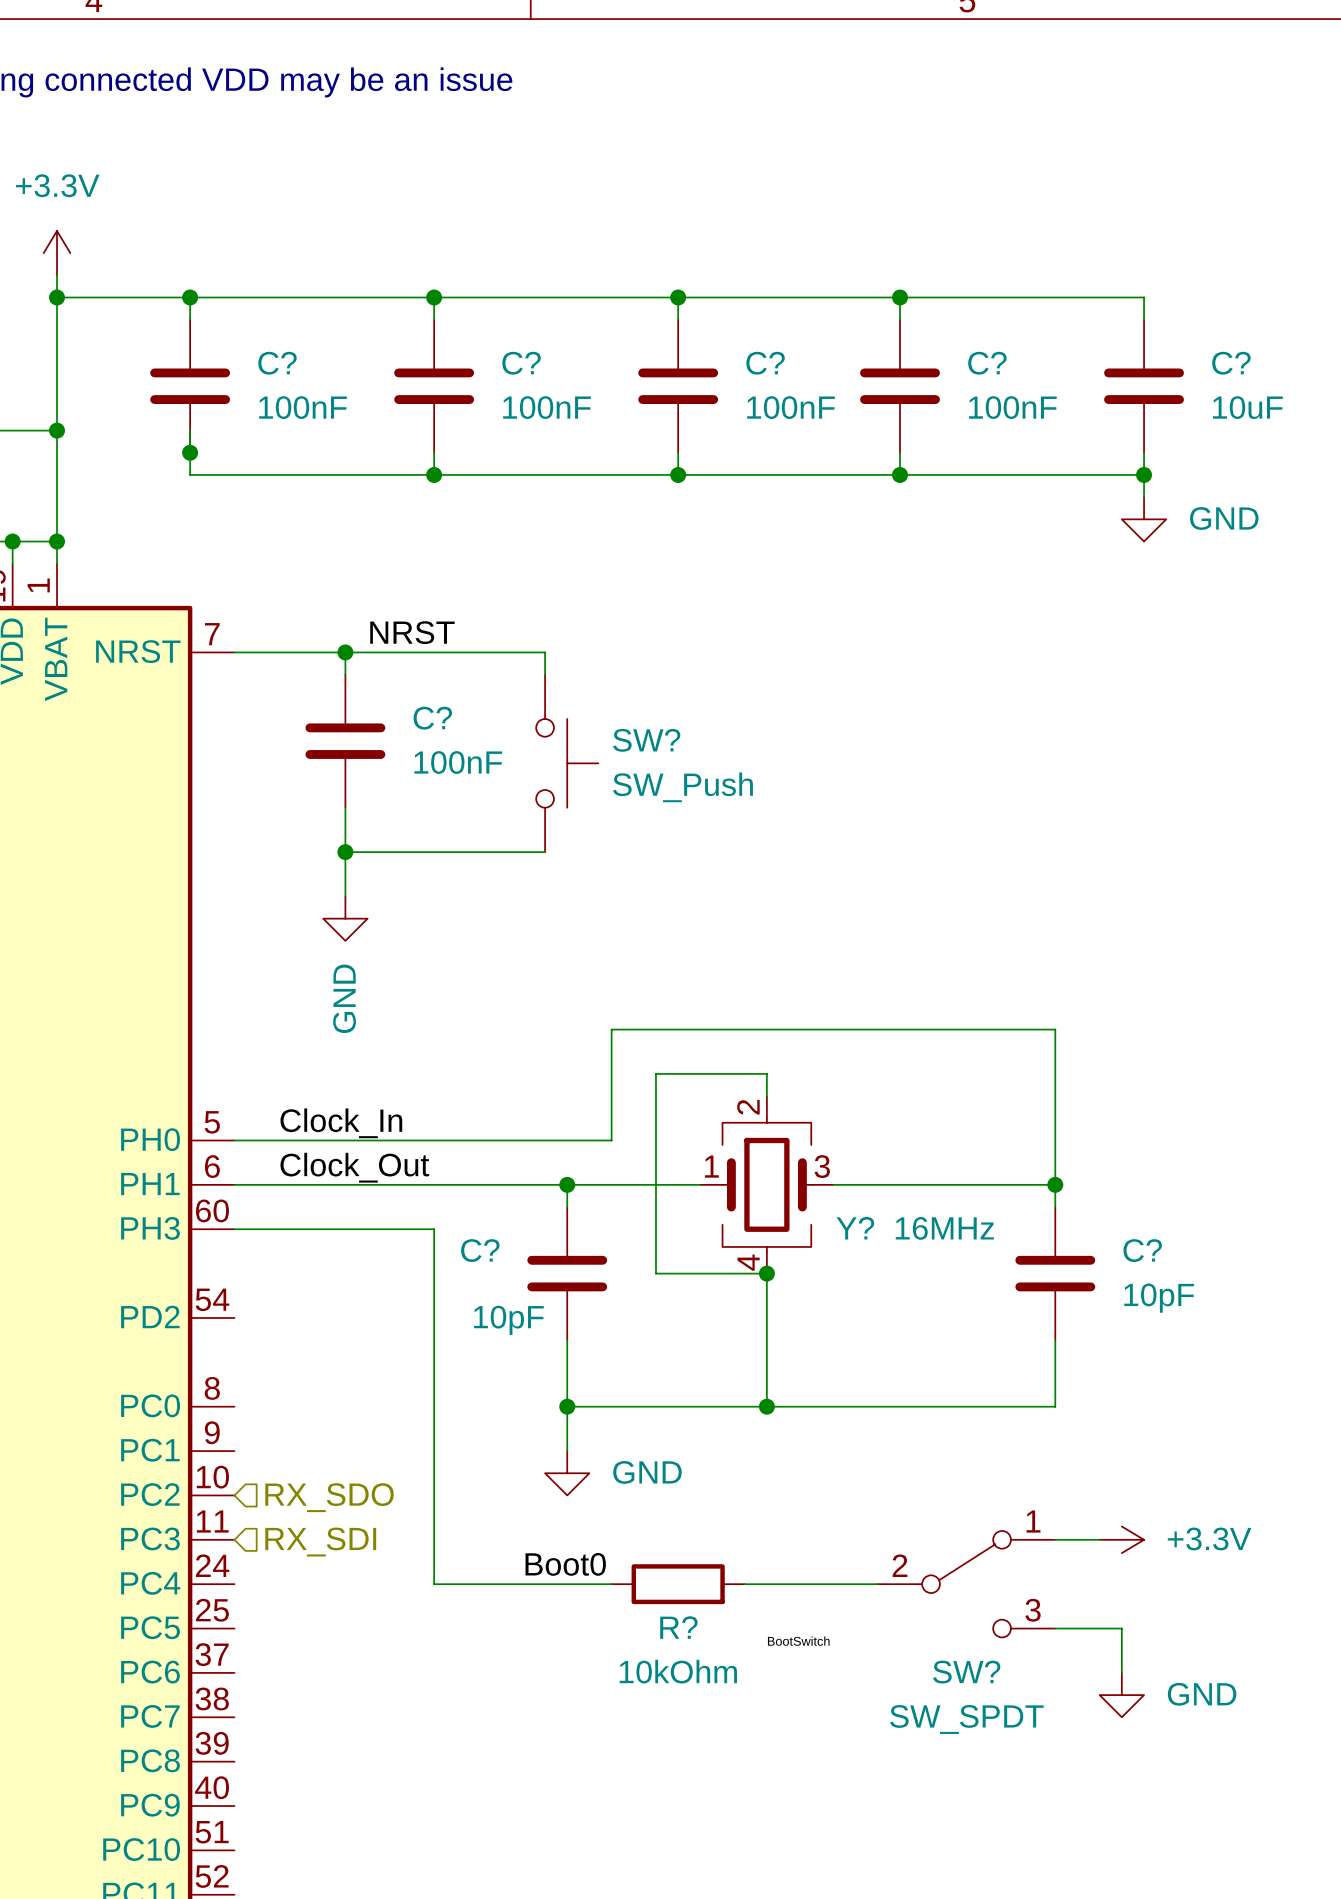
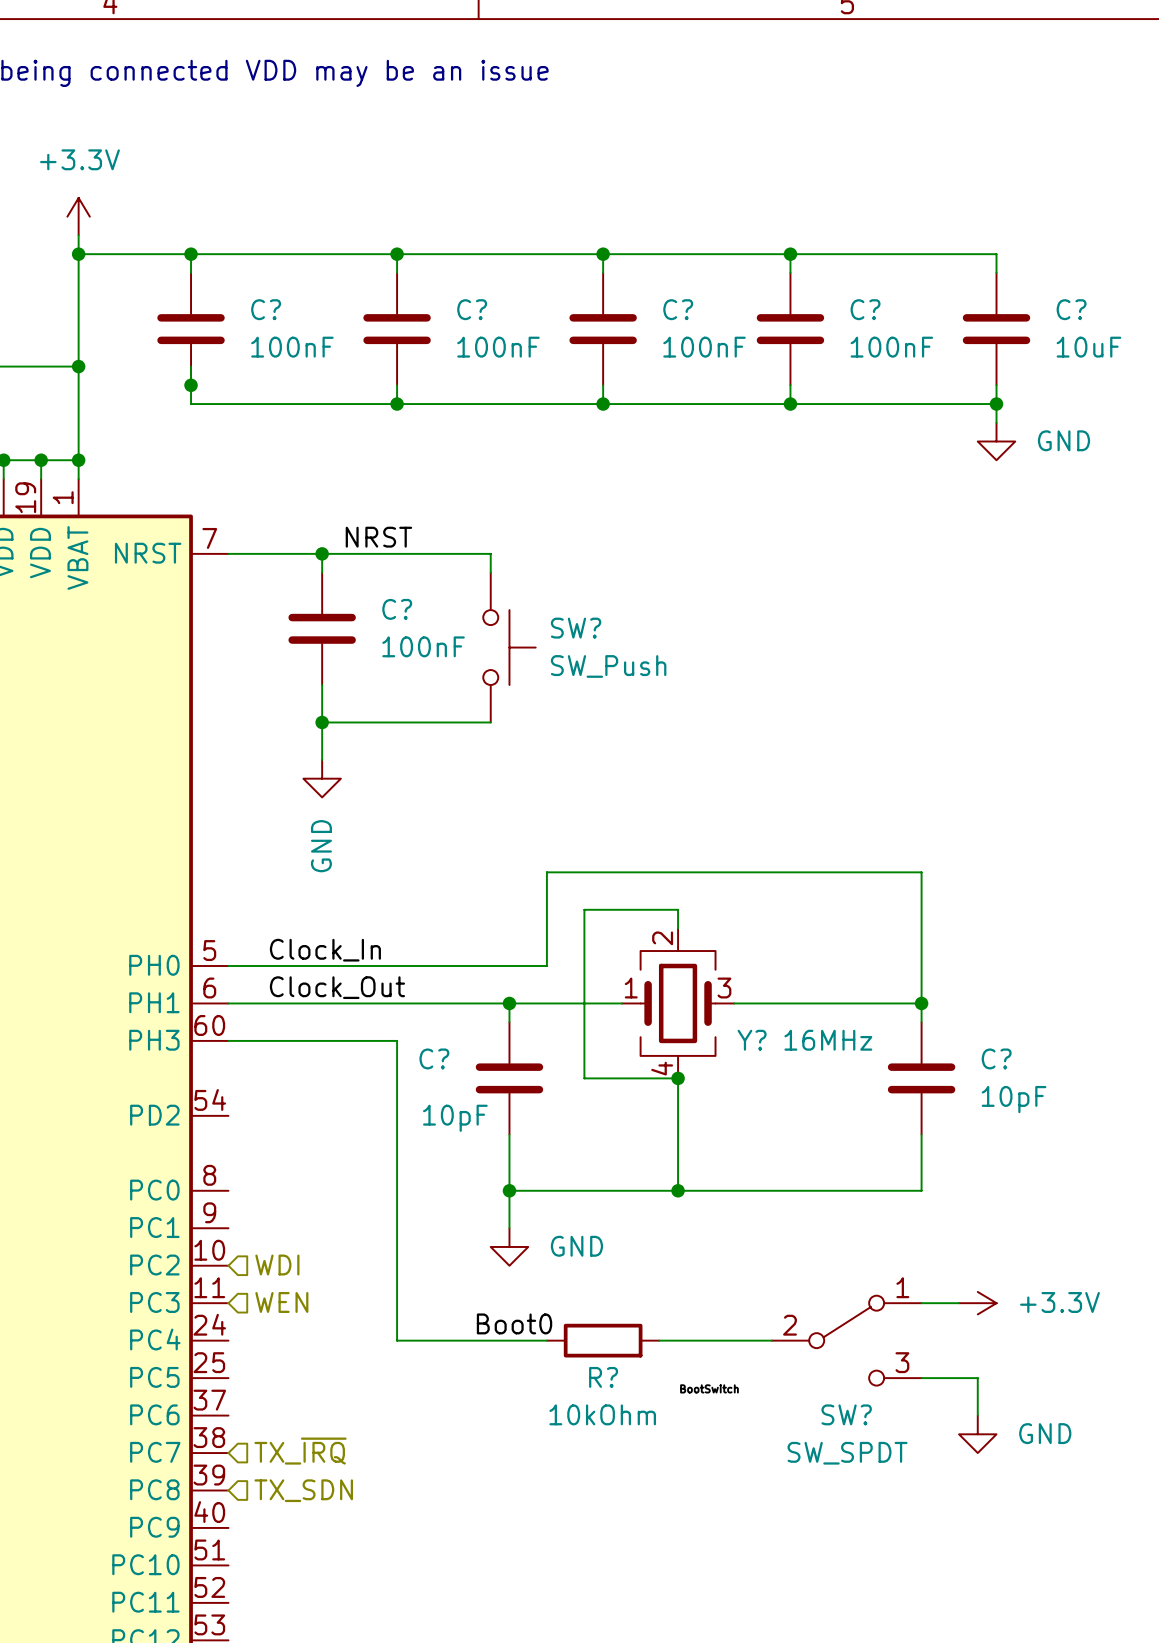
hierarchical label: RX_SDO (329, 1497) -> WDI (277, 1265)
hierarchical label: RX_SDI (320, 1542) -> WEN (281, 1302)
hierarchical label: none -> TX_~{IRQ} (300, 1451)
hierarchical label: none -> TX_SDN (303, 1490)

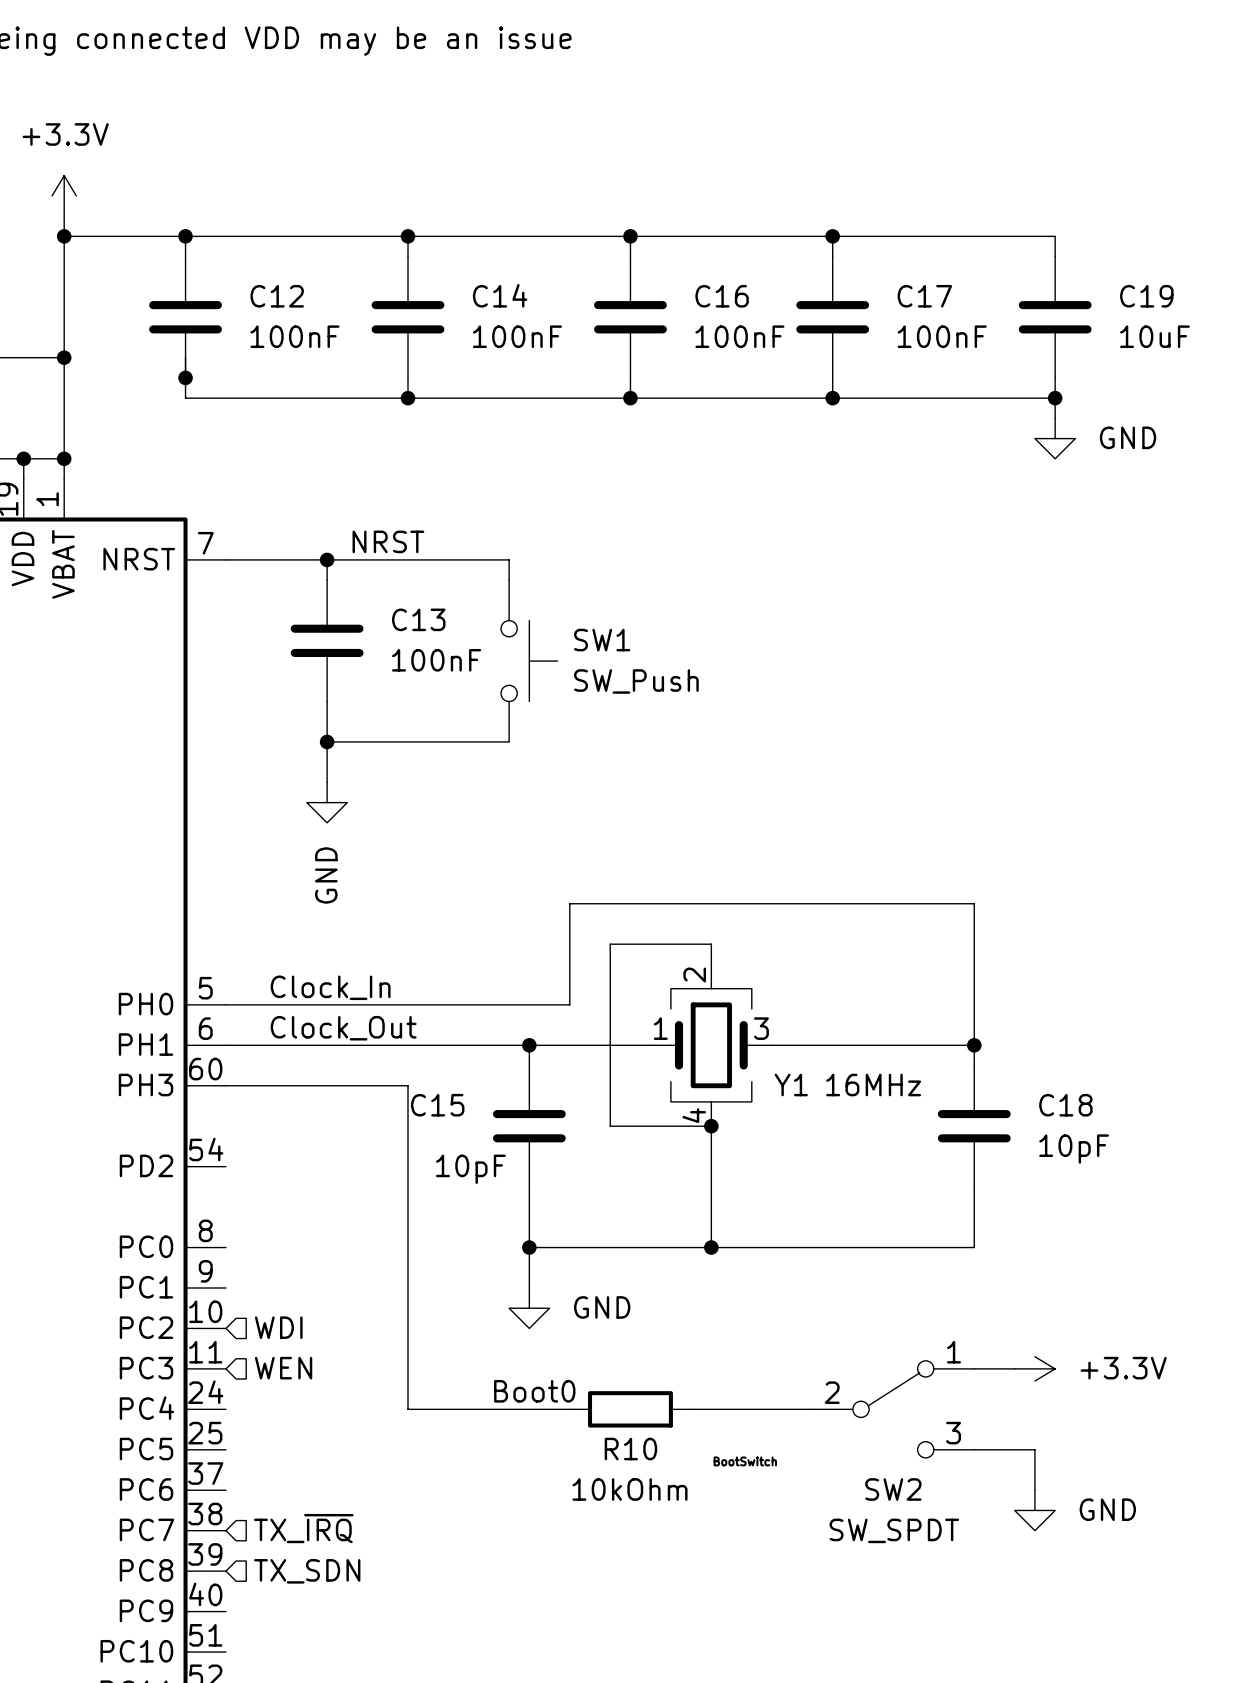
C? name: C? (266, 309) -> C12 (277, 296)
C? name: C? (472, 309) -> C14 (500, 295)
C? name: C? (678, 309) -> C16 (722, 296)
C? name: C? (865, 309) -> C17 (924, 296)
C? name: C? (1071, 309) -> C19 (1146, 296)
C? name: C? (397, 609) -> C13 (418, 619)
SW? name: SW? (576, 628) -> SW1 (602, 640)
Y? name: Y? (752, 1040) -> Y1 (791, 1085)
C? name: C? (434, 1058) -> C15 (437, 1105)
C? name: C? (996, 1058) -> C18 (1065, 1105)
R? name: R? (603, 1377) -> R10 (630, 1449)
SW? name: SW? (846, 1414) -> SW2 (893, 1489)

